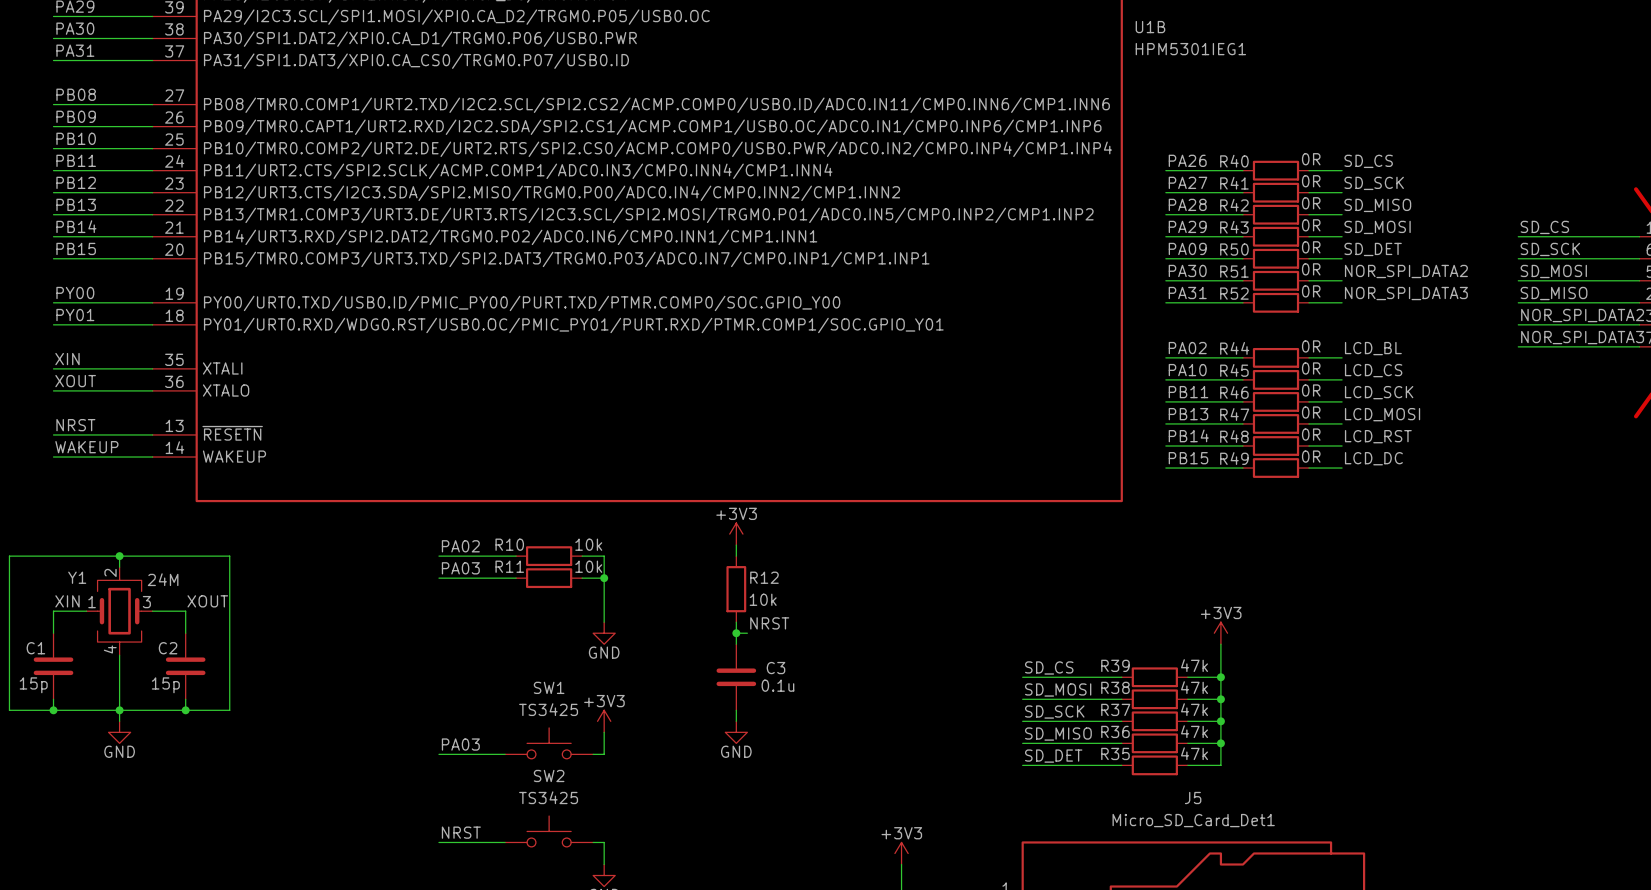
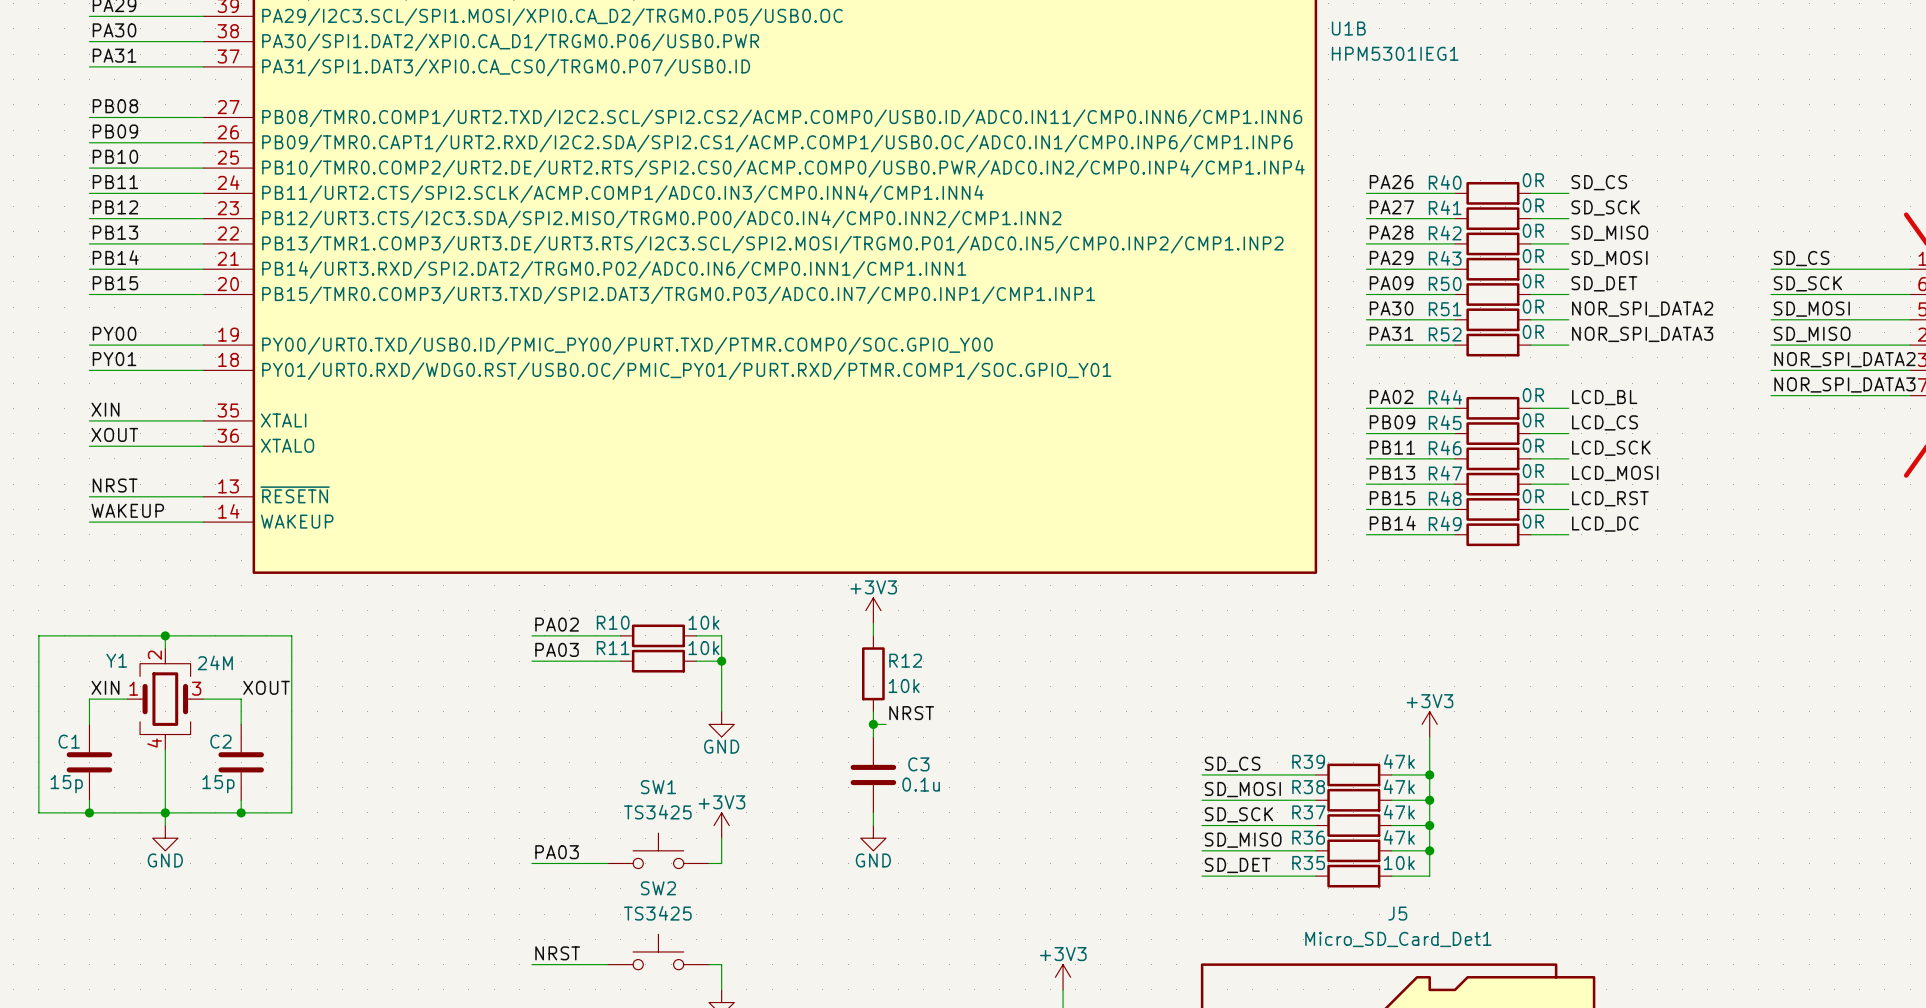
label: PA10 (1187, 370) -> PB09 (1392, 422)
label: PB14 (1188, 435) -> PB15 (1392, 498)
label: PB15 (1188, 458) -> PB14 (1392, 523)
R35 value: 47k (1194, 753) -> 10k (1399, 863)

